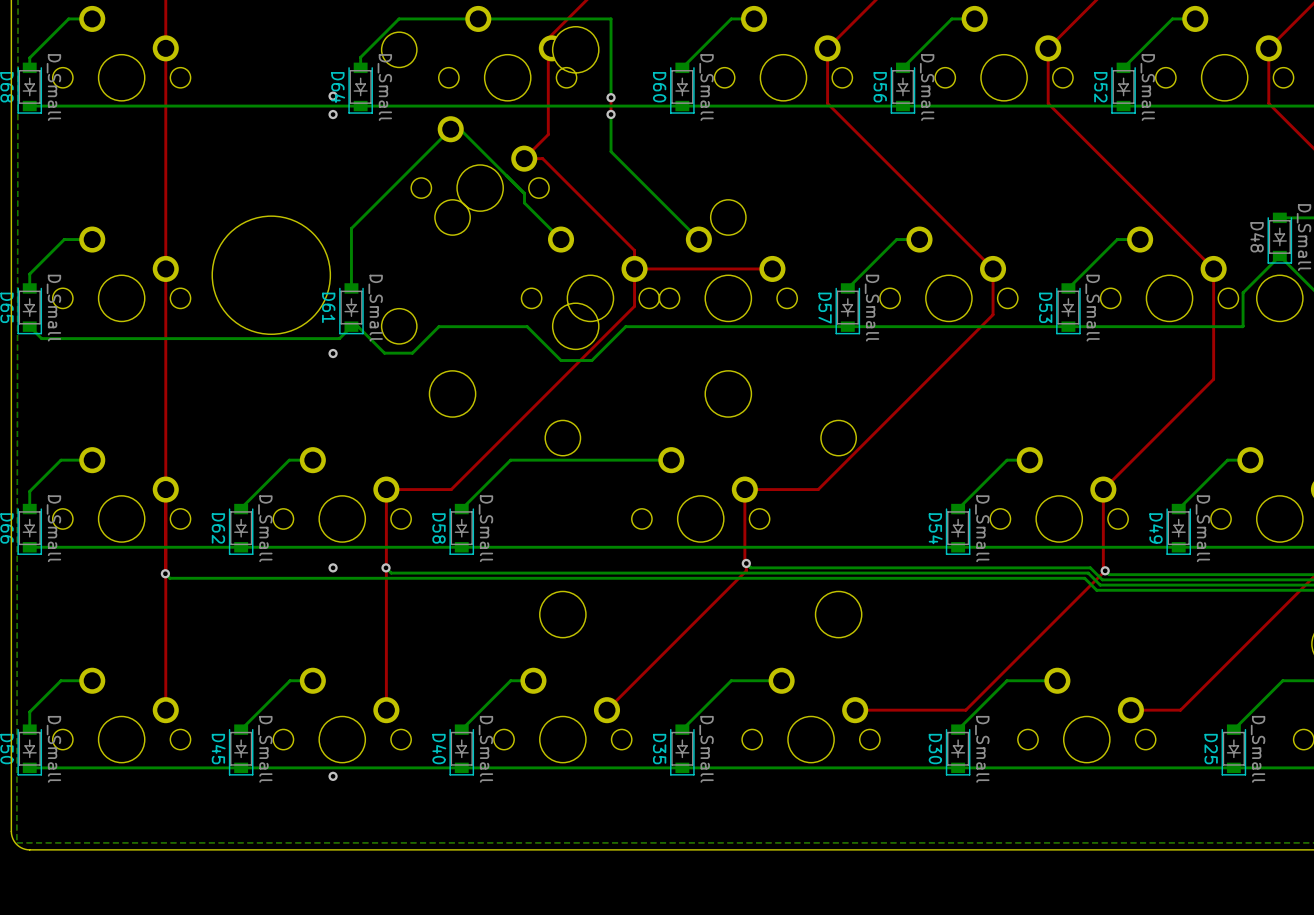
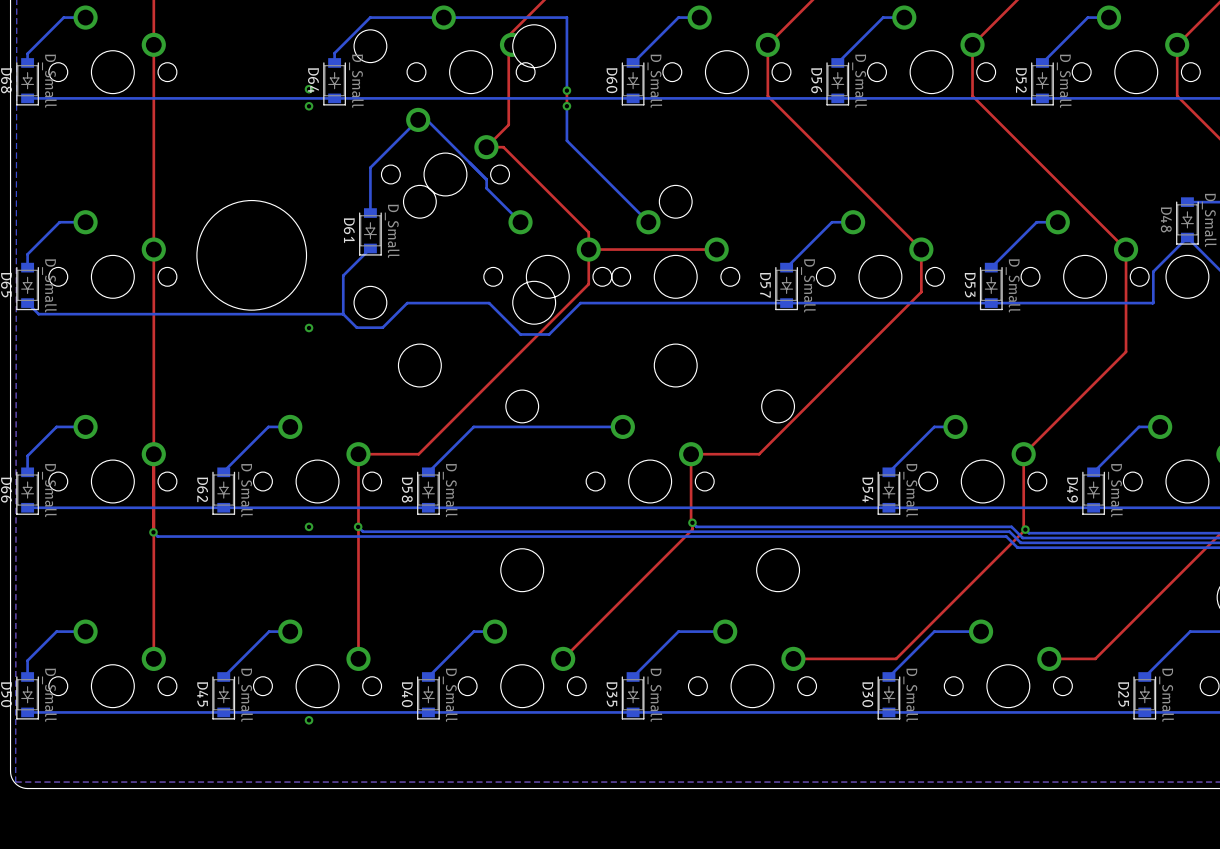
bottom track: (399, 180) (351, 228) (351, 288) -> (370, 167) (370, 213)
D61 position: (351, 308) -> (370, 231)
bottom track: (369, 338) (358, 326) (351, 326) (339, 338) -> (370, 248) (343, 275) (343, 314) (315, 314)

